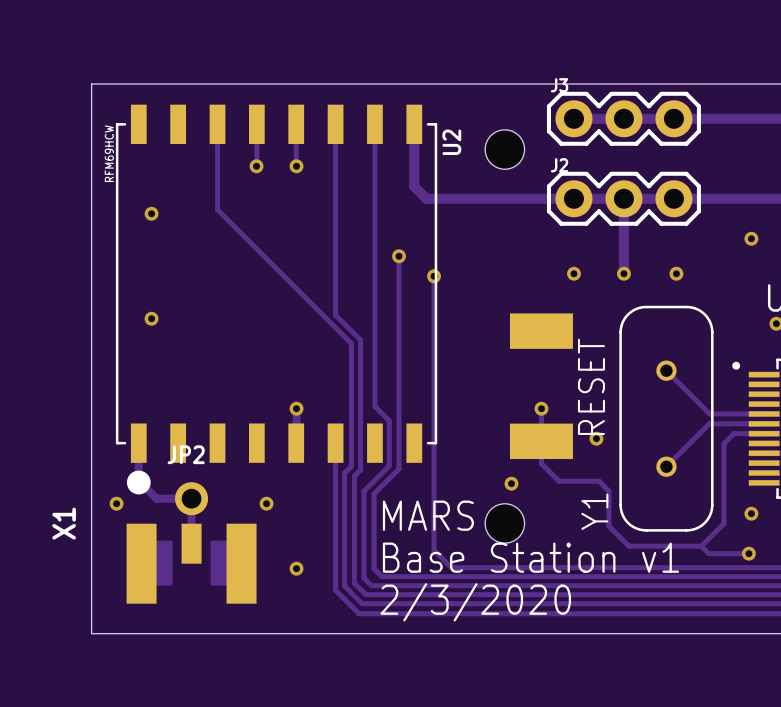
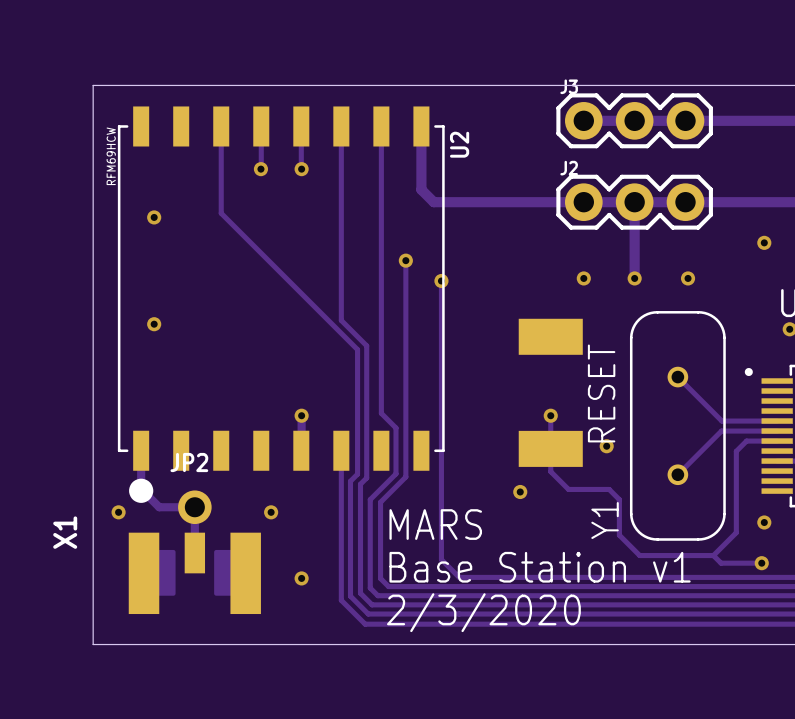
hole: (504, 149) -> none
hole: (504, 523) -> none

